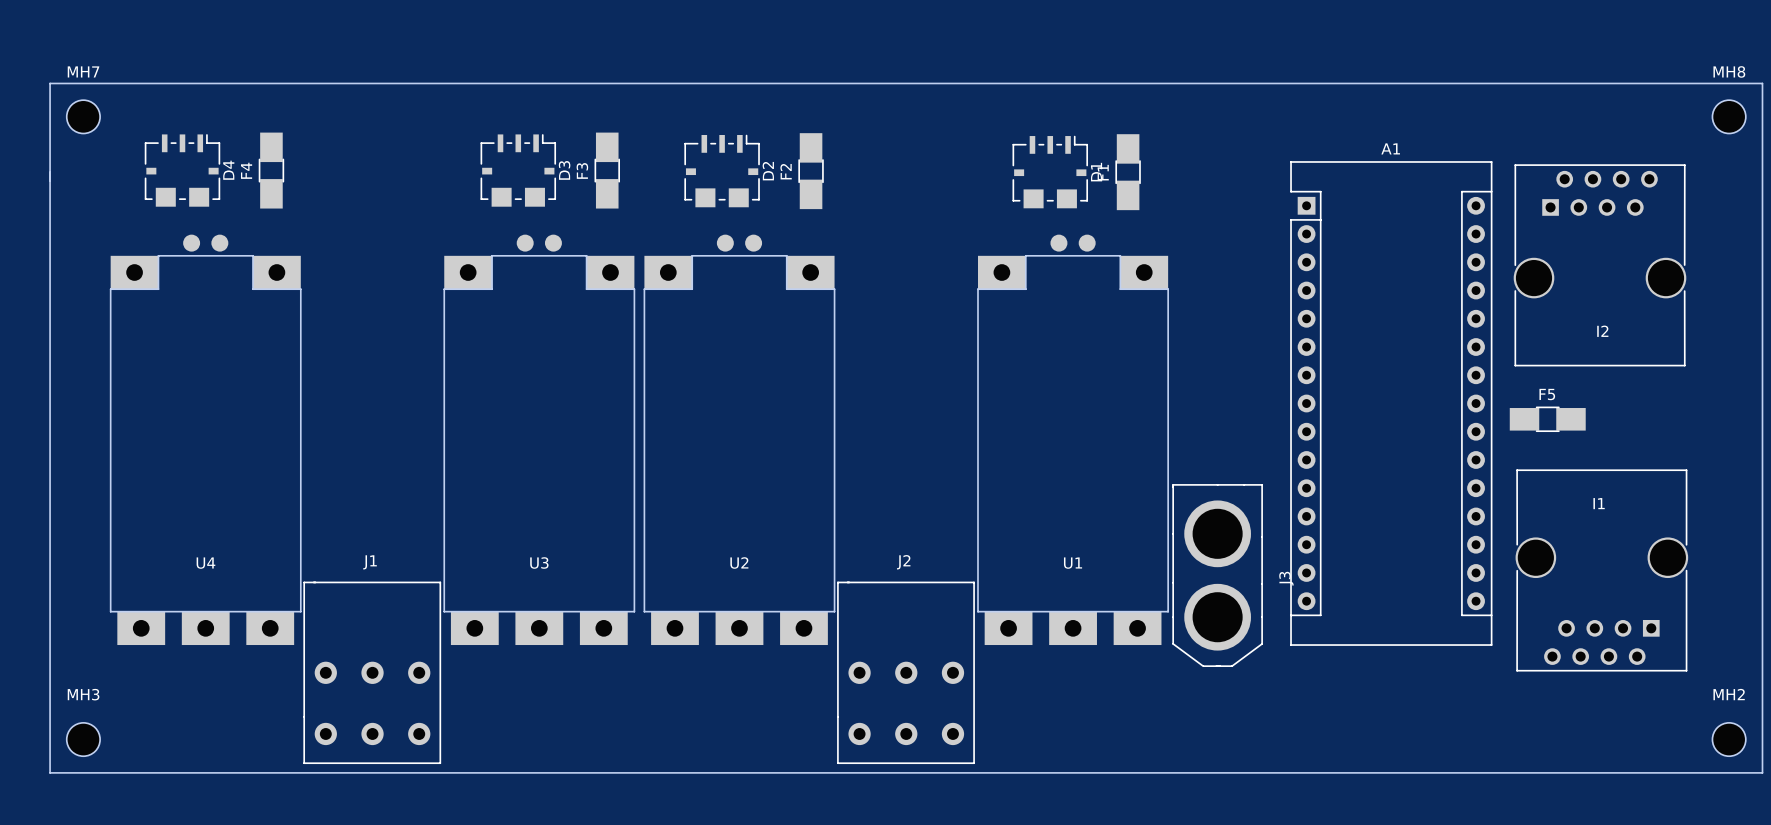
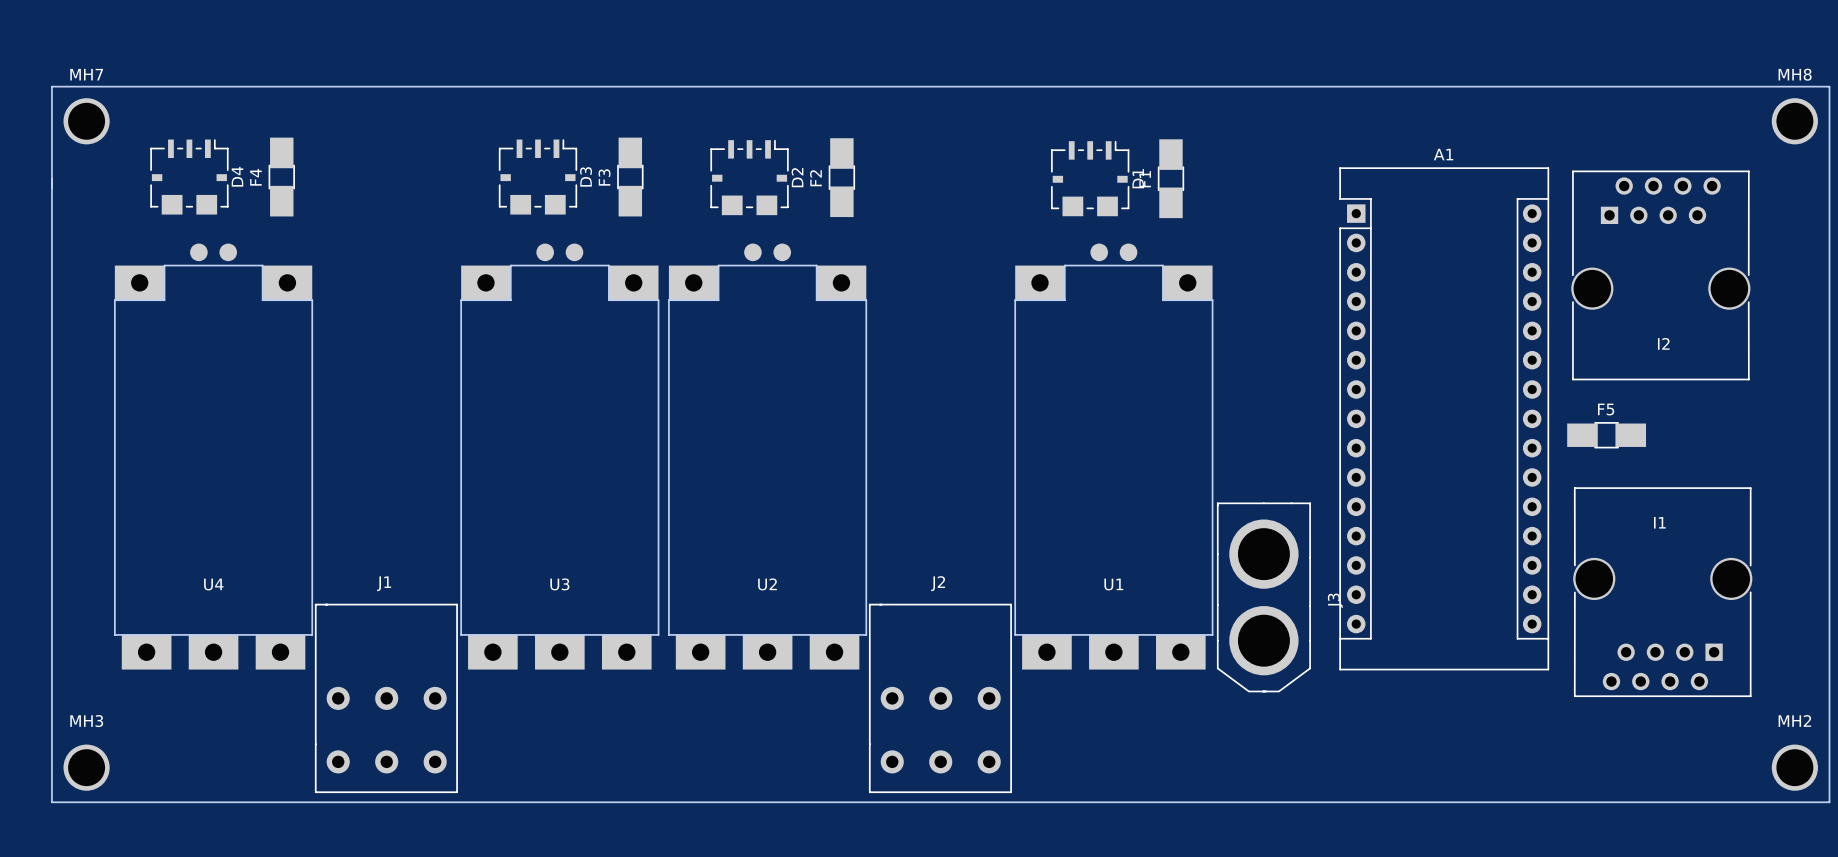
MH7 footprint: [66, 100, 101, 134] -> [63, 98, 110, 145]
MH8 footprint: [1712, 100, 1746, 134] -> [1771, 98, 1818, 145]
MH3 footprint: [66, 722, 101, 757] -> [63, 744, 110, 791]
MH2 footprint: [1712, 722, 1746, 757] -> [1771, 744, 1818, 791]

